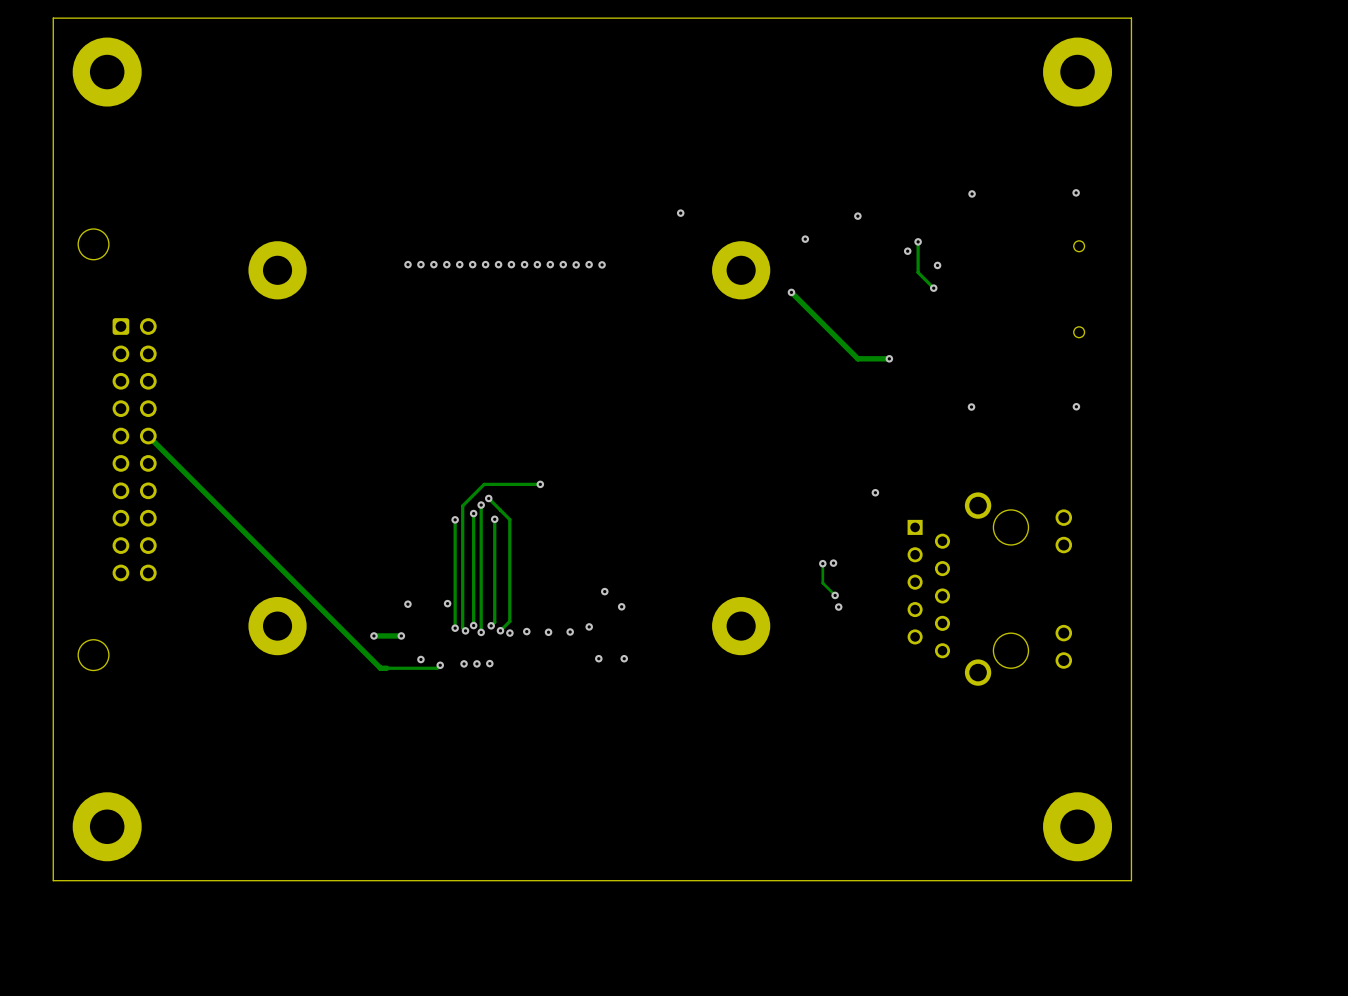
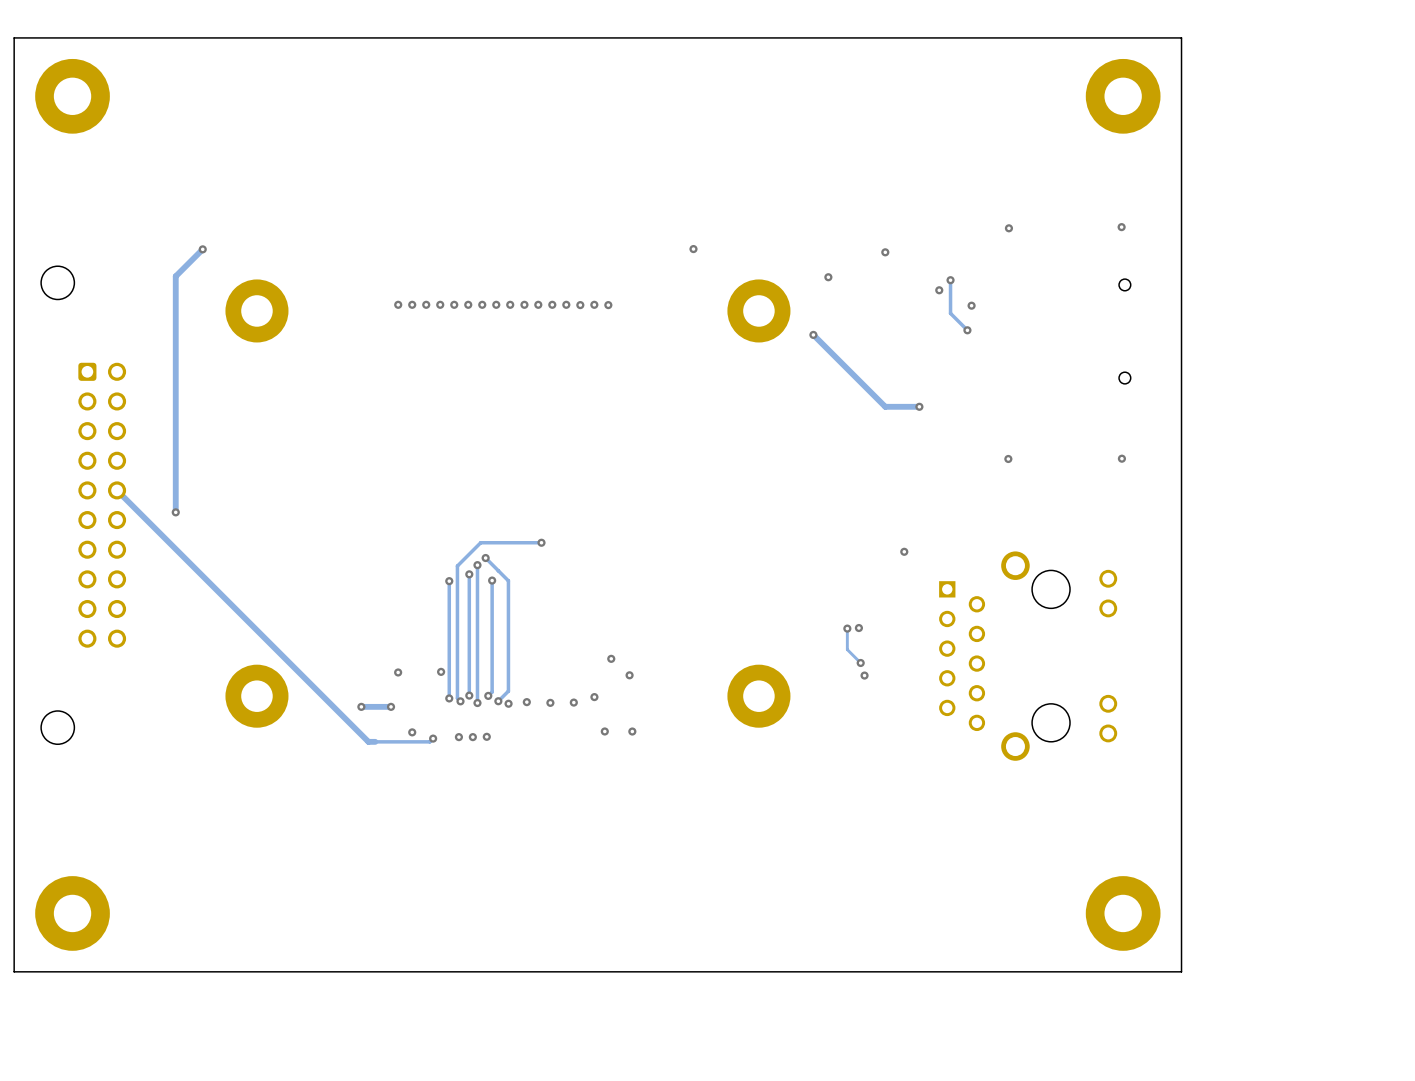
track: none -> (202, 249) (175, 276) (175, 512)
via: none -> (202, 249)
via: none -> (175, 512)

